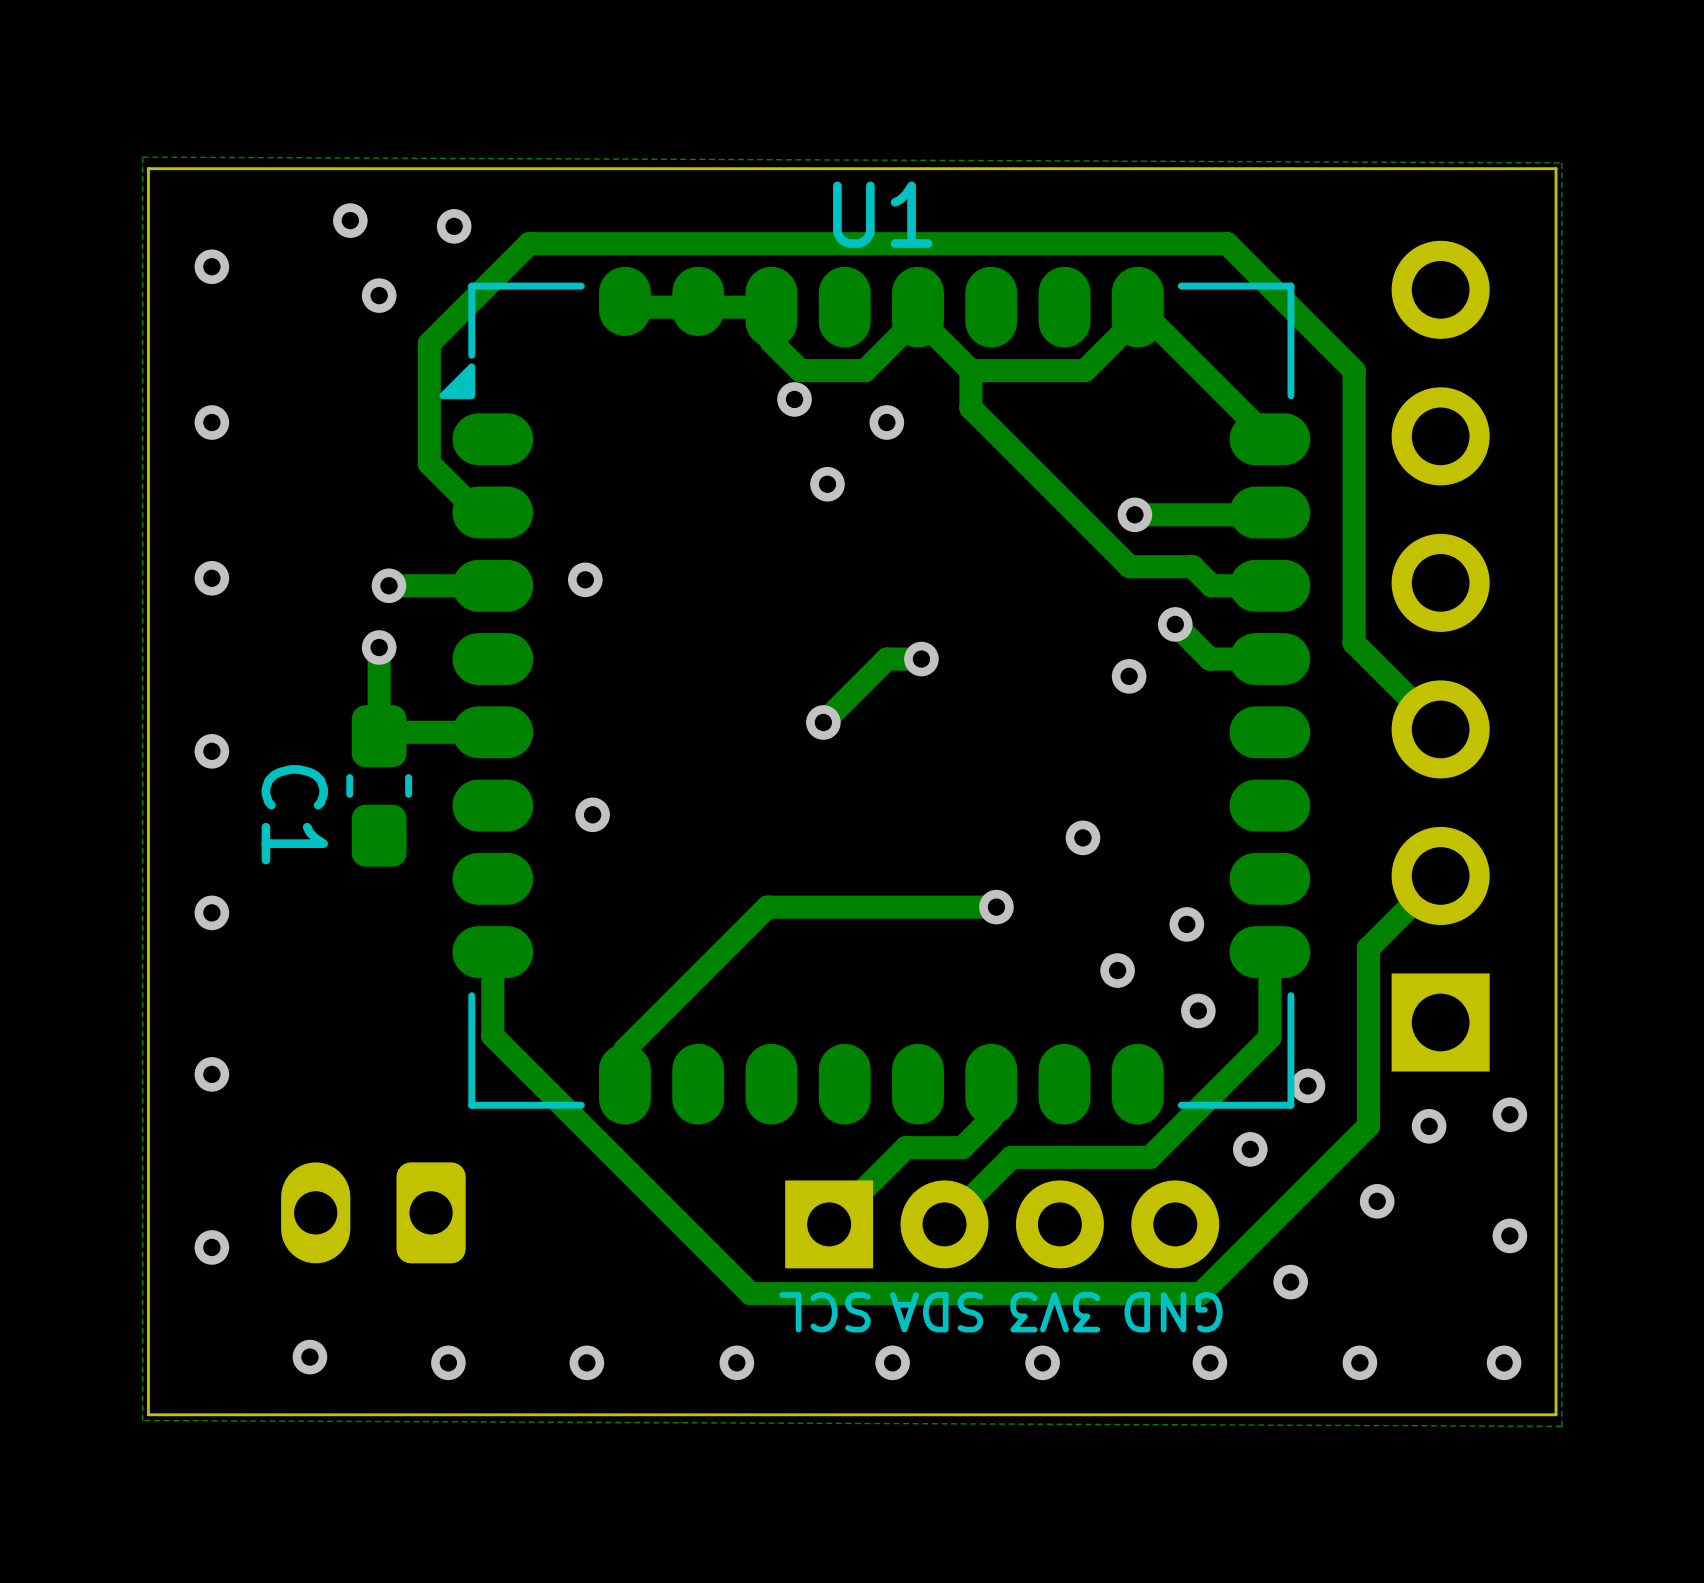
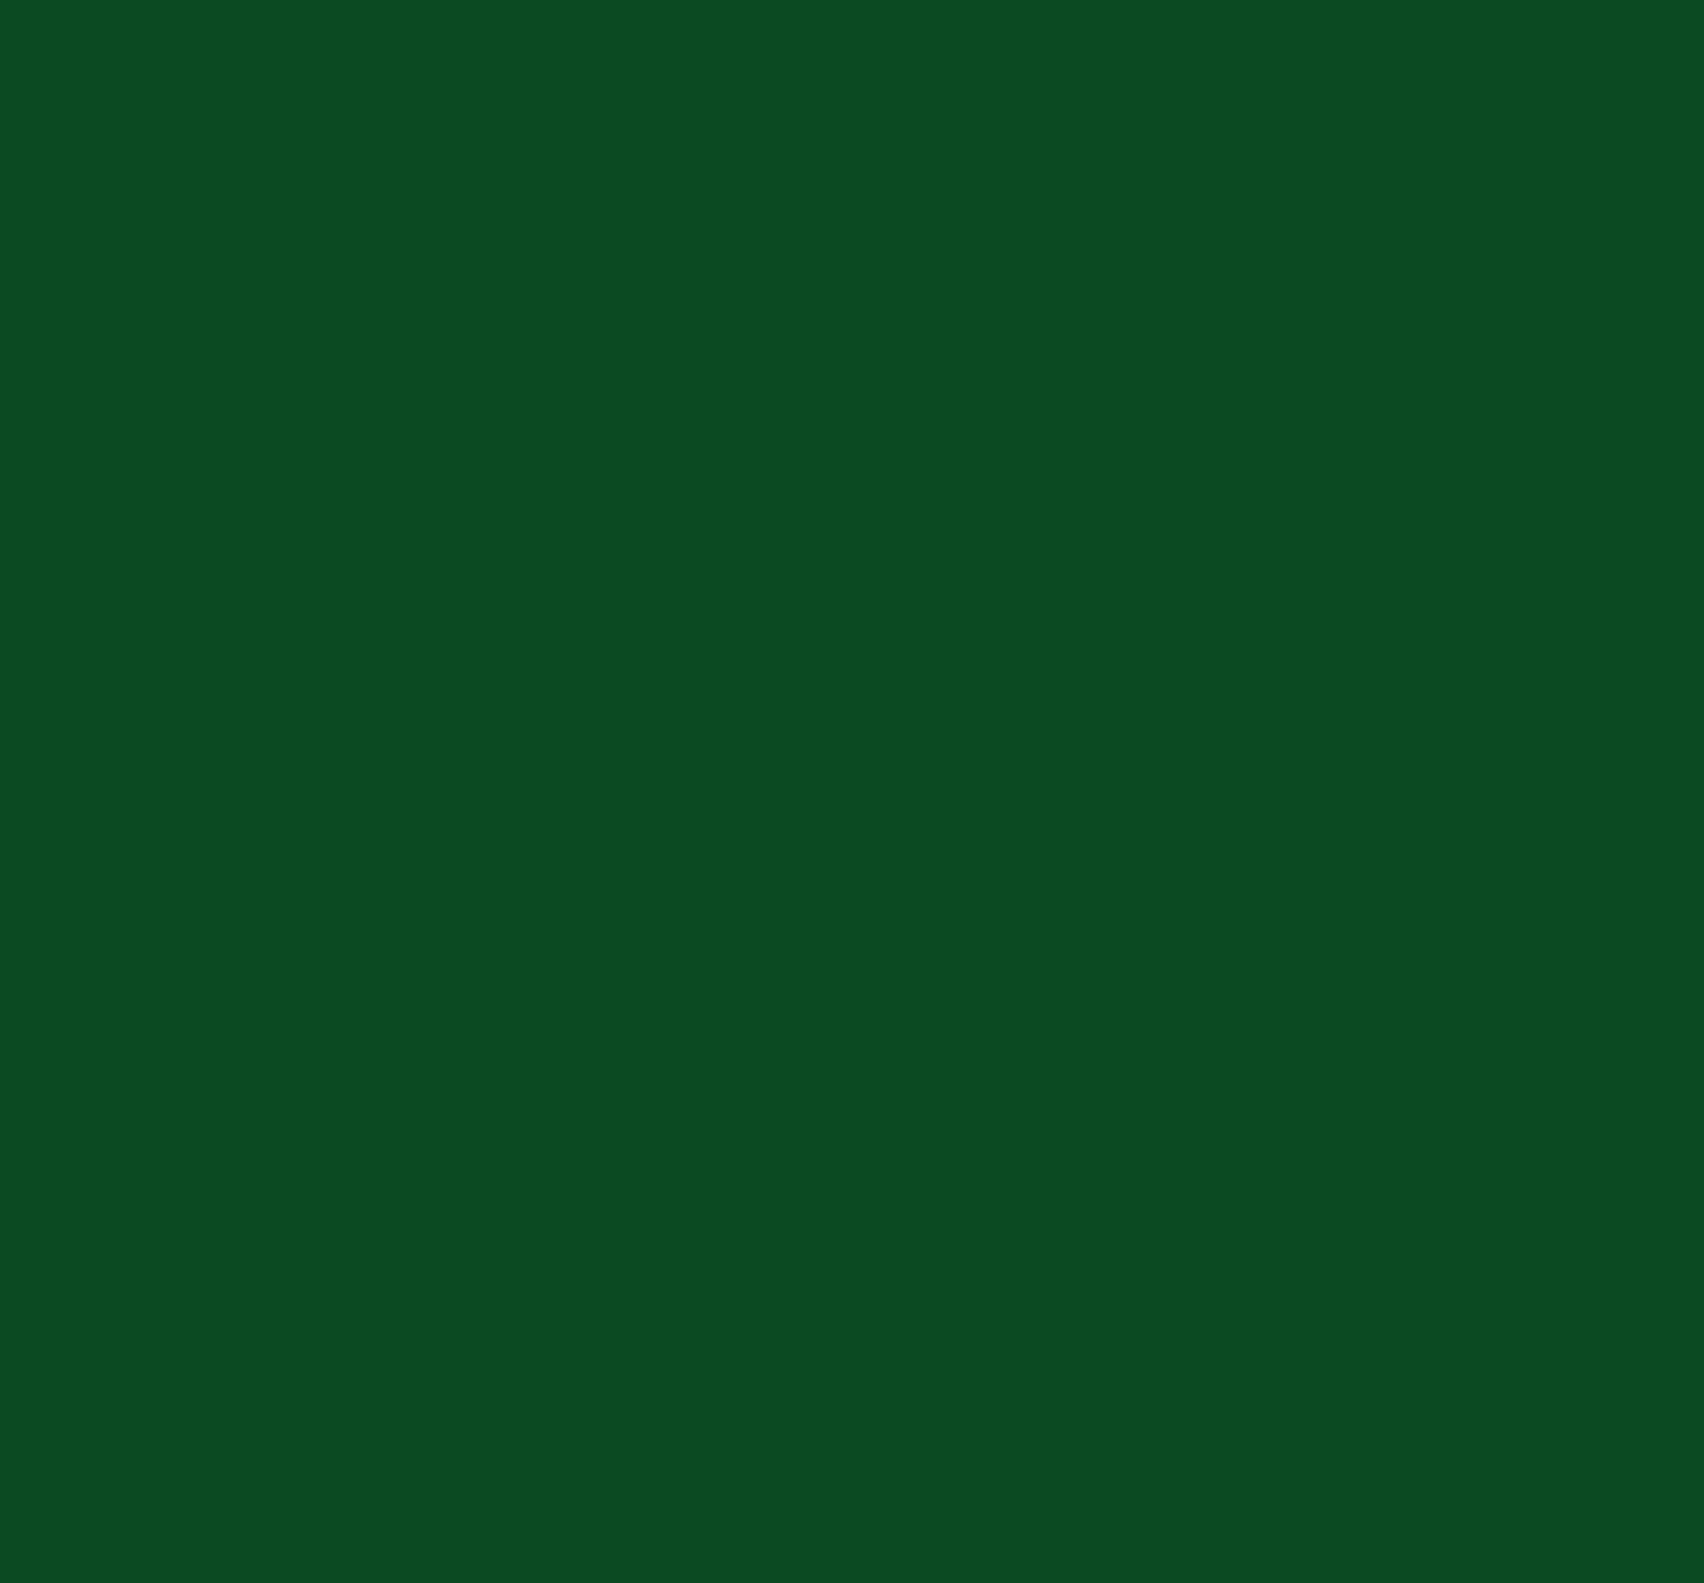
zone outline: (142, 157) (142, 1420) (1561, 1426) (1561, 162) (142, 157) -> none
board edge: (1556, 168) (148, 168) (148, 1414) (1556, 1414) (1556, 168) -> none
via: (350, 220) -> none
via: (454, 226) -> none
via: (211, 266) -> none
via: (379, 295) -> none
track: (624, 301) (630, 307) (771, 307) (771, 341) (800, 370) (865, 370) (917, 317) -> none
track: (917, 317) (970, 370) -> none
track: (970, 370) (970, 407) (1129, 566) (1192, 566) (1211, 585) (1269, 585) -> none
track: (970, 370) (1084, 370) (1137, 317) (1137, 307) (1269, 439) -> none
via: (794, 399) -> none
via: (211, 422) -> none
via: (886, 422) -> none
via: (827, 484) -> none
track: (492, 512) (478, 512) (429, 463) (429, 343) (529, 243) (1227, 243) (1354, 370) (1354, 642) (1440, 729) -> none
track: (1269, 512) (1267, 514) (1134, 514) -> none
via: (1134, 514) -> none
via: (211, 578) -> none
via: (585, 579) -> none
via: (388, 585) -> none
track: (492, 585) (388, 585) -> none
track: (1175, 624) (1209, 659) (1269, 659) -> none
via: (1175, 624) -> none
track: (379, 647) (379, 736) (383, 732) (492, 732) -> none
via: (379, 647) -> none
part: (1440, 656) -> none
track: (921, 659) (886, 659) (823, 722) -> none
via: (921, 659) -> none
via: (1129, 676) -> none
U1: (874, 695) -> none
via: (823, 722) -> none
via: (211, 751) -> none
C1: (379, 785) -> none
via: (592, 814) -> none
via: (1082, 837) -> none
track: (1440, 875) (1368, 948) (1368, 1125) (1200, 1293) (750, 1293) (492, 1035) (492, 952) -> none
track: (996, 907) (767, 907) (624, 1049) (624, 1084) -> none
via: (996, 907) -> none
via: (211, 912) -> none
via: (1186, 924) -> none
track: (1269, 952) (1269, 1037) (1150, 1157) (1011, 1157) (944, 1224) -> none
via: (1117, 970) -> none
via: (1198, 1010) -> none
via: (211, 1074) -> none
track: (991, 1084) (991, 1118) (962, 1147) (905, 1147) (829, 1224) -> none
via: (1307, 1085) -> none
via: (1509, 1114) -> none
via: (1429, 1126) -> none
via: (1250, 1149) -> none
via: (1377, 1201) -> none
part: (373, 1212) -> none
part: (1002, 1224) -> none
via: (1509, 1235) -> none
via: (211, 1247) -> none
via: (1290, 1282) -> none
text: SCL (824, 1312) -> none
text: SDA (936, 1312) -> none
text: 3V3 (1055, 1312) -> none
text: GND (1173, 1312) -> none
via: (309, 1357) -> none
via: (448, 1362) -> none
via: (586, 1362) -> none
via: (736, 1362) -> none
via: (892, 1362) -> none
via: (1042, 1362) -> none
via: (1209, 1362) -> none
via: (1359, 1362) -> none
via: (1504, 1362) -> none

